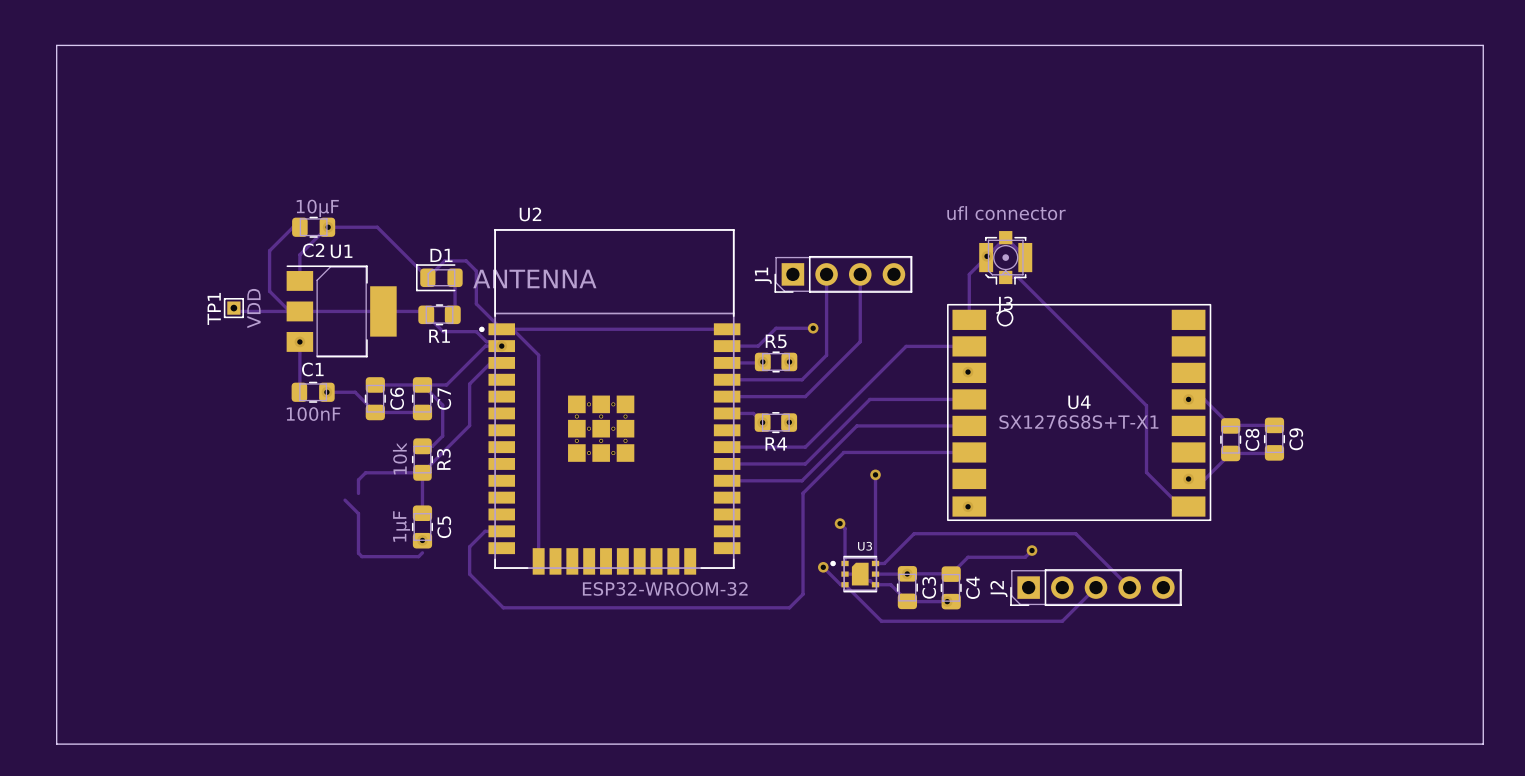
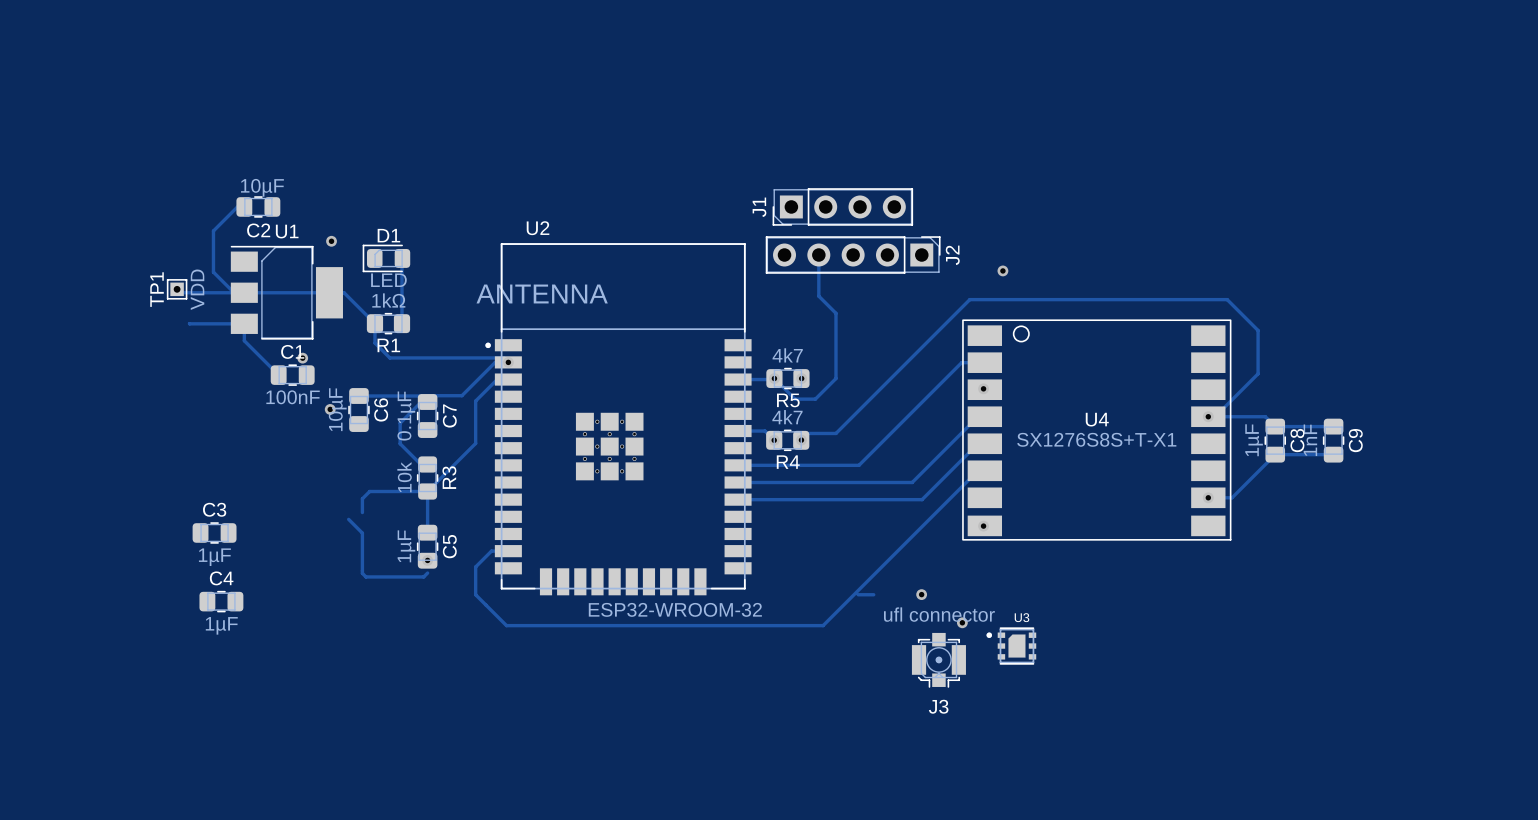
board edge: (56, 45) (56, 744) (1483, 744) (1483, 45) (56, 45) -> none
track: (299, 227) (293, 227) (269, 250) (269, 291) (289, 311) -> (244, 206) (237, 206) (213, 230) (213, 272) (234, 292)
C2 position: (313, 227) -> (258, 206)
track: (327, 227) (299, 254) (299, 280) -> none
track: (328, 227) (377, 227) (427, 277) (444, 260) (466, 260) (476, 271) (476, 303) (501, 329) (727, 329) -> none
track: none -> (818, 255) (818, 296) (835, 313) (835, 378) (815, 399) (795, 399) (774, 378)
track: none -> (402, 258) (401, 323)
J3 position: (1005, 257) -> (938, 660)
track: (1025, 257) (1005, 237) (969, 274) (969, 319) -> none
D1 value: none -> LED (388, 280)
track: (826, 274) (826, 355) (802, 379) (727, 379) -> none
J1 position: (843, 274) -> (842, 206)
track: (860, 274) (860, 341) (805, 396) (727, 396) -> none
D1 position: (439, 277) -> (386, 258)
track: (455, 277) (455, 312) (452, 314) -> none
track: (1005, 277) (1018, 277) (1146, 405) (1146, 472) (1180, 506) (1188, 506) -> none
R1 value: none -> 1kΩ (388, 300)
track: none -> (189, 323) (244, 323) (244, 340) (278, 375)
track: (233, 308) (237, 311) (422, 311) (443, 331) (476, 331) (486, 341) -> (177, 289) (180, 292) (344, 292) (374, 323) (374, 343) (389, 357) (492, 357)
TP1 position: (233, 308) -> (177, 289)
U1 position: (341, 311) -> (286, 292)
R1 position: (439, 314) -> (388, 323)
track: (813, 328) (776, 328) (758, 346) (727, 346) -> none
via: (813, 328) -> none
track: (512, 329) (538, 355) (538, 561) -> none
R5 value: none -> 4k7 (787, 355)
track: (299, 341) (299, 392) -> none
R5 name position: R5 (776, 341) -> R5 (788, 400)
track: (488, 346) (485, 346) (446, 384) (375, 384) -> none
track: (946, 346) (906, 346) (805, 447) -> (961, 362) (859, 465) (817, 465)
track: none -> (358, 396) (427, 396)
track: (422, 384) (442, 405) (442, 436) (432, 446) (422, 446) -> (495, 362) (461, 395) (427, 395) (400, 423) (400, 443) (420, 464) (427, 464)
C1 position: (313, 392) -> (292, 375)
track: (326, 392) (355, 392) (375, 412) (422, 412) -> none
C6 value: none -> 10µF (337, 409)
C6 position: (375, 398) -> (358, 410)
C7 value: none -> 0.1µF (406, 416)
R4 value: none -> 4k7 (787, 417)
track: (962, 399) (869, 399) (805, 463) -> (977, 416) (912, 482) (817, 482)
track: none -> (1215, 416) (1258, 373) (1258, 330) (1227, 299) (969, 299) (835, 433) (801, 433)
track: (1204, 399) (1230, 425) (1274, 425) -> (1224, 416) (1265, 416) (1275, 426) (1333, 426)
C8 value: none -> 1µF (1254, 440)
C9 value: none -> 1nF (1310, 440)
track: (962, 425) (856, 425) (802, 480) -> (977, 443) (922, 499) (814, 499)
C8 position: (1230, 439) -> (1275, 440)
C9 position: (1274, 439) -> (1333, 440)
track: (962, 452) (843, 452) (803, 493) (803, 594) (789, 607) (503, 607) (499, 604) -> (977, 470) (823, 625) (506, 625)
track: (1274, 452) (1230, 453) (1205, 478) -> (1333, 454) (1275, 454) (1232, 497) (1225, 497)
track: (875, 474) (875, 563) (884, 563) (914, 533) (1075, 533) (1129, 587) -> none
via: (875, 474) -> none
track: (840, 523) (845, 528) (845, 563) -> none
via: (840, 523) -> none
C3 value: none -> 1µF (214, 557)
track: (1032, 550) (1025, 557) (968, 557) (951, 574) (875, 574) -> none
via: (1032, 550) -> none
track: (823, 567) (840, 584) (845, 584) (881, 621) (1062, 621) (1095, 587) -> none
via: (823, 567) -> none
U3 position: (854, 574) -> (1011, 646)
track: (867, 580) (870, 580) (874, 584) (890, 584) (907, 601) (951, 601) -> none
C3 rotation: 0° (907, 587) -> 90° clockwise (214, 532)
C3 position: (907, 587) -> (214, 532)
C3 name position: C3 (929, 587) -> C3 (214, 509)
C4 rotation: 0° (951, 587) -> 90° clockwise (221, 601)
C4 position: (951, 587) -> (221, 601)
C4 name position: C4 (972, 587) -> C4 (221, 578)
J2 rotation: 0° (1095, 587) -> 180° (853, 255)
J2 position: (1095, 587) -> (853, 255)
C4 value: none -> 1µF (221, 625)

